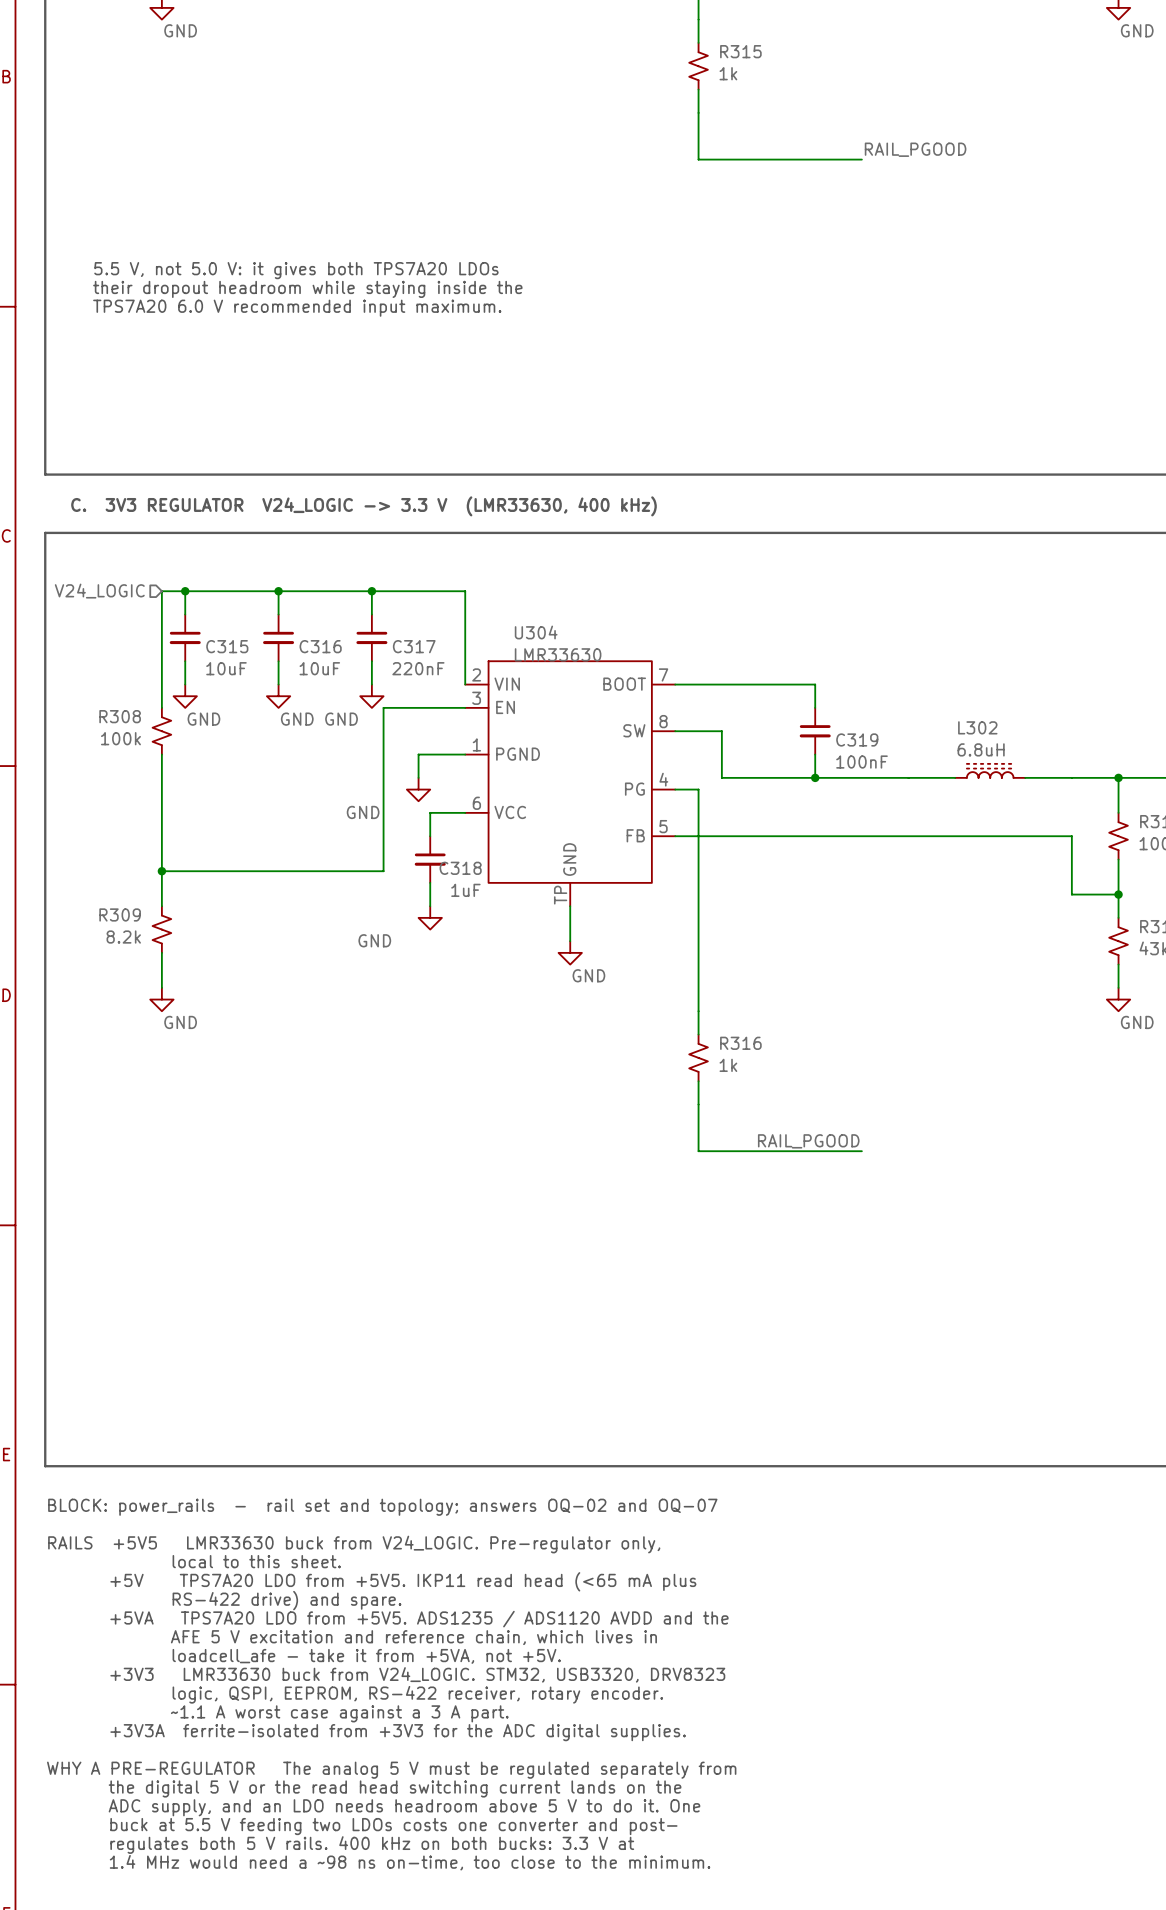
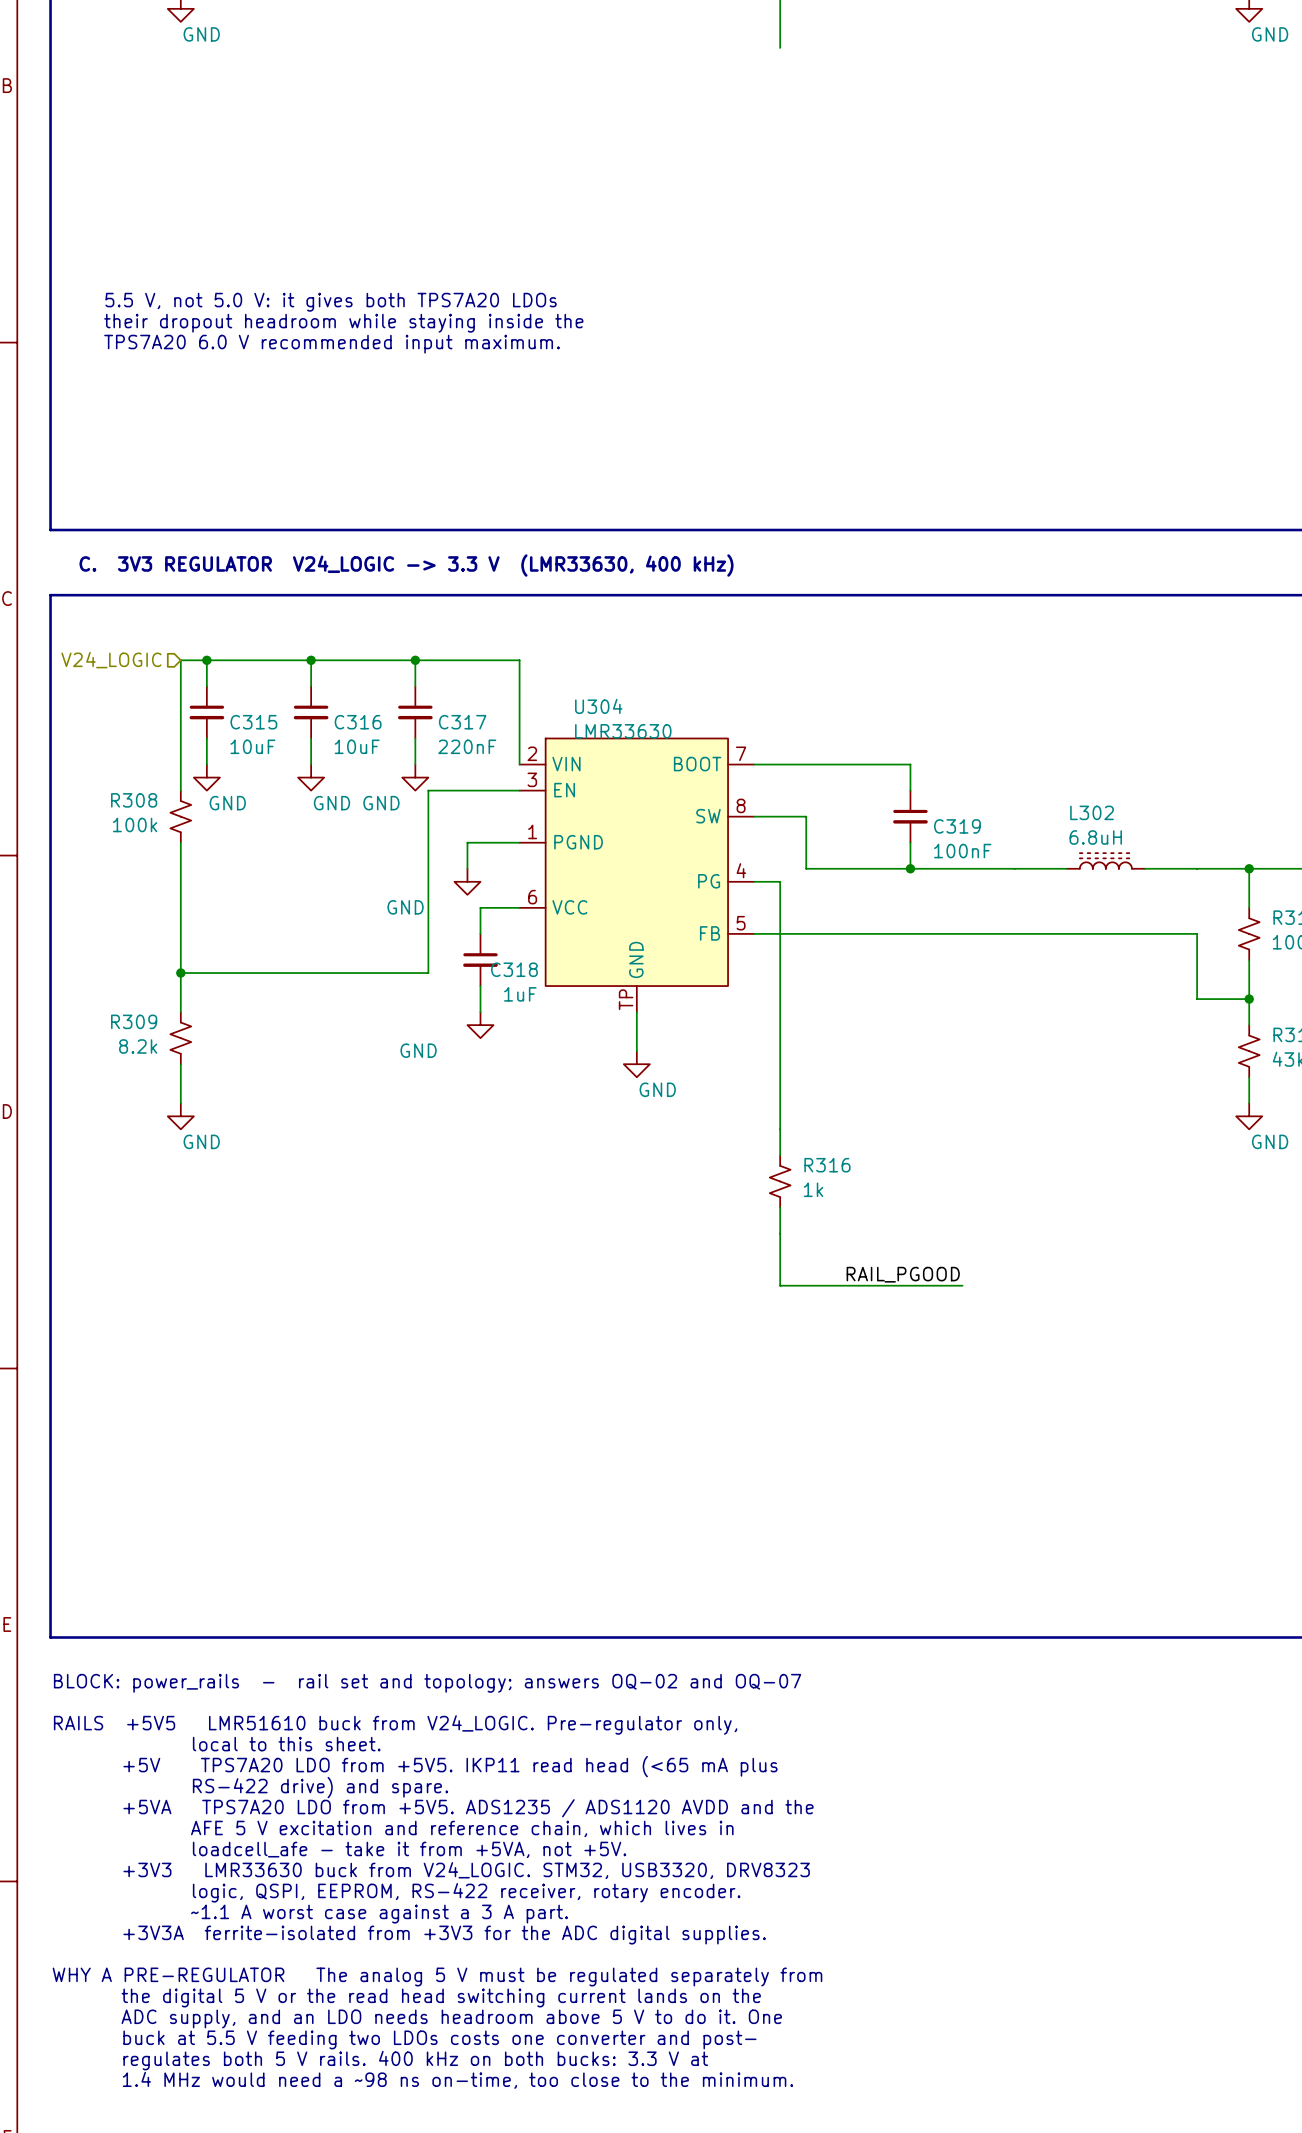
R315: 1k (698, 66) -> none
wire: (698, 89) (698, 159) (861, 159) -> none
label: RAIL_PGOOD (915, 149) -> none
text: RAILS +5V5 LMR33630 buck from V24_LOGIC. Pre-regulator only, (354, 1544) -> RAILS +5V5 LMR51610 buck from V24_LOGIC. Pre-regulator only, (395, 1724)

